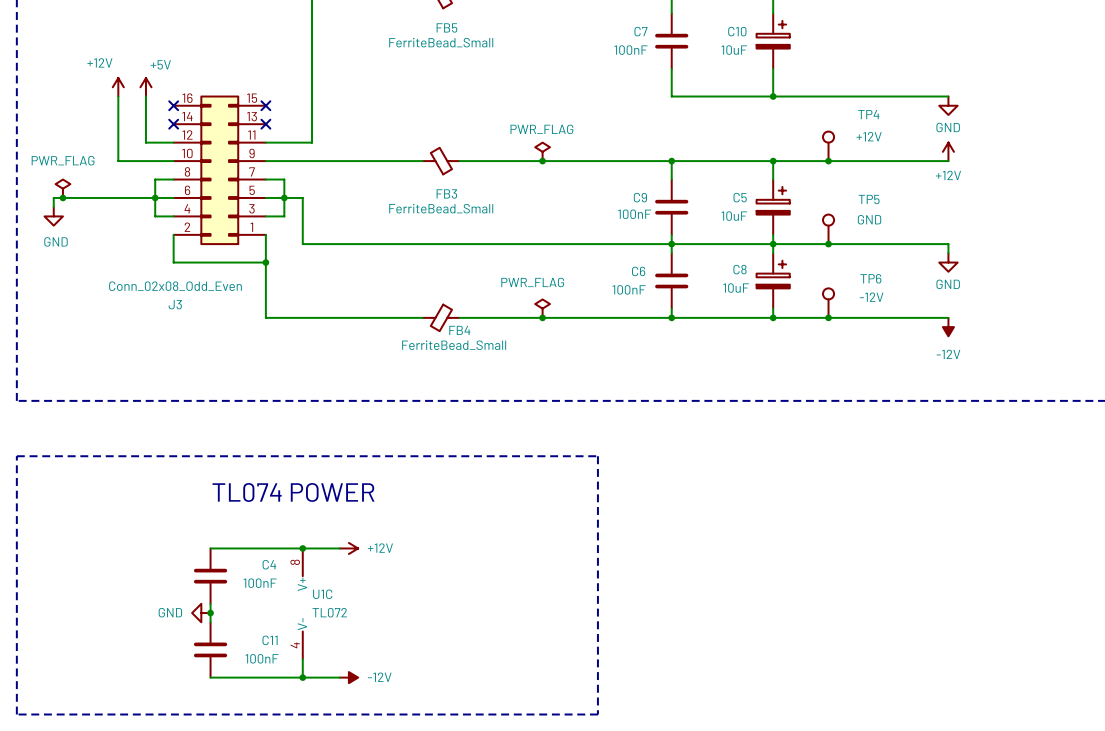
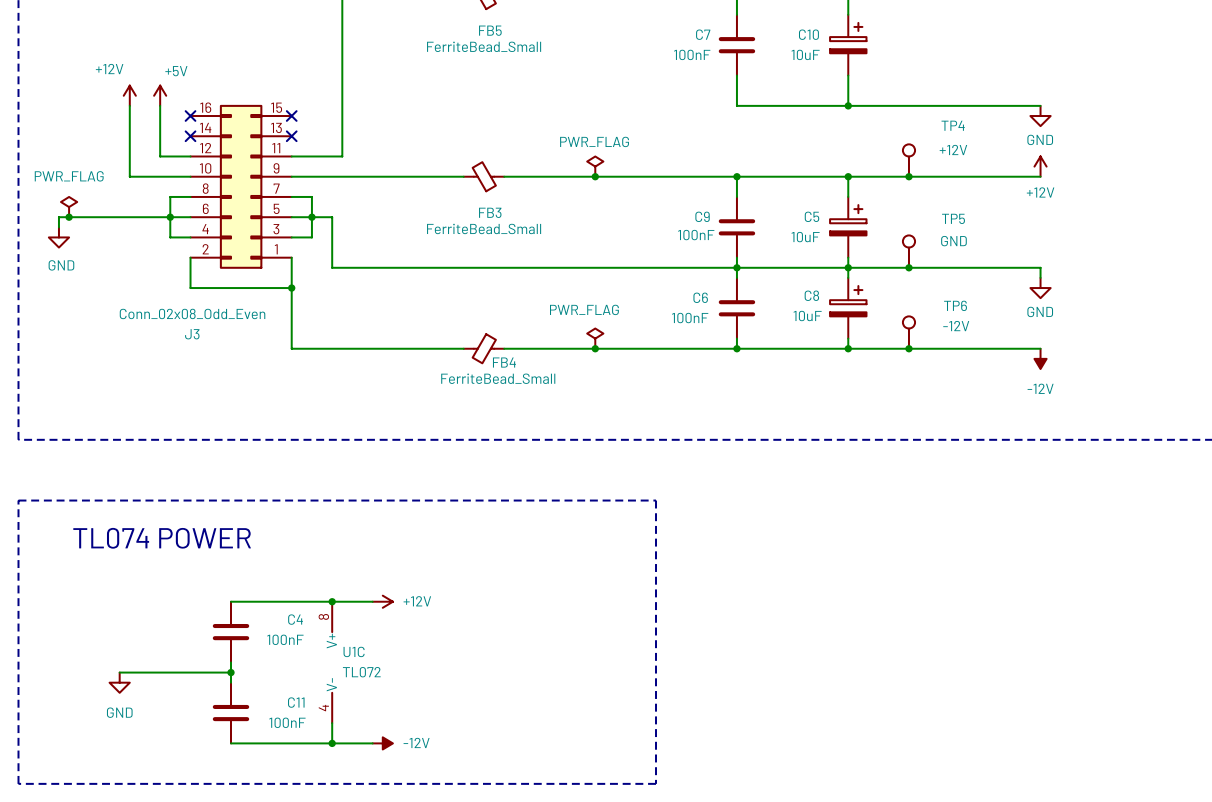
text position: TL074 POWER (293, 492) -> TL074 POWER (162, 538)
wire: none -> (119, 672) (230, 672)
power symbol rotation: 0° (201, 613) -> 90° counterclockwise (119, 682)
power symbol position: GND (201, 613) -> GND (119, 682)

